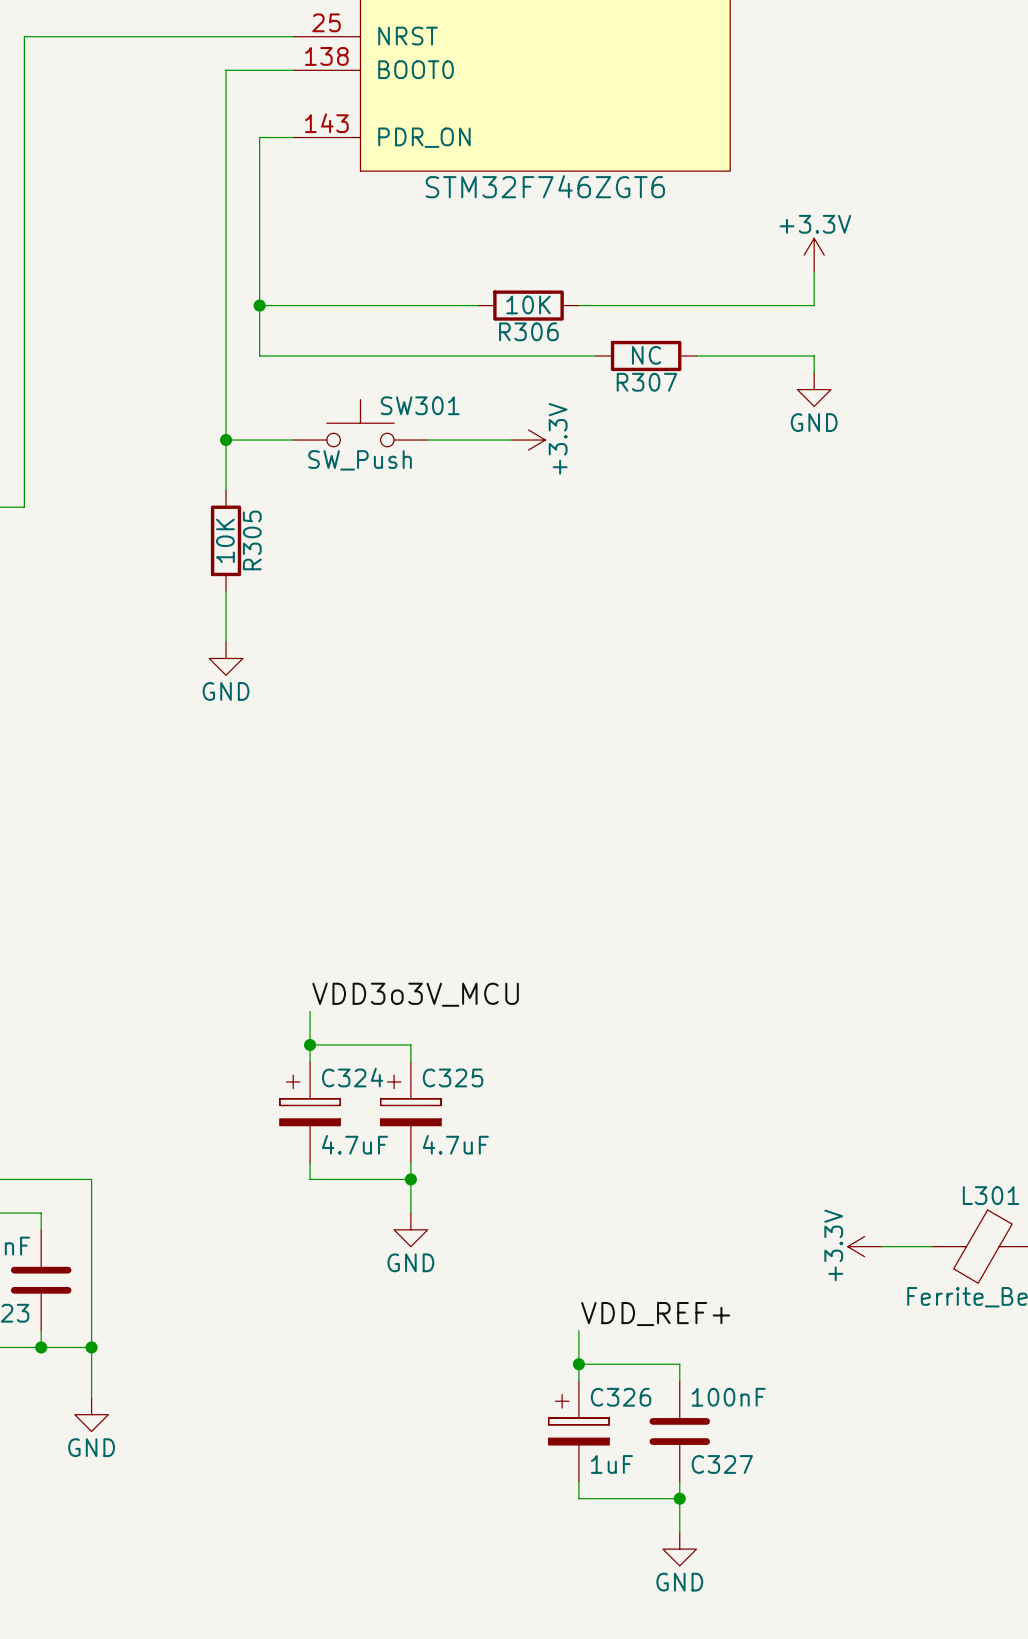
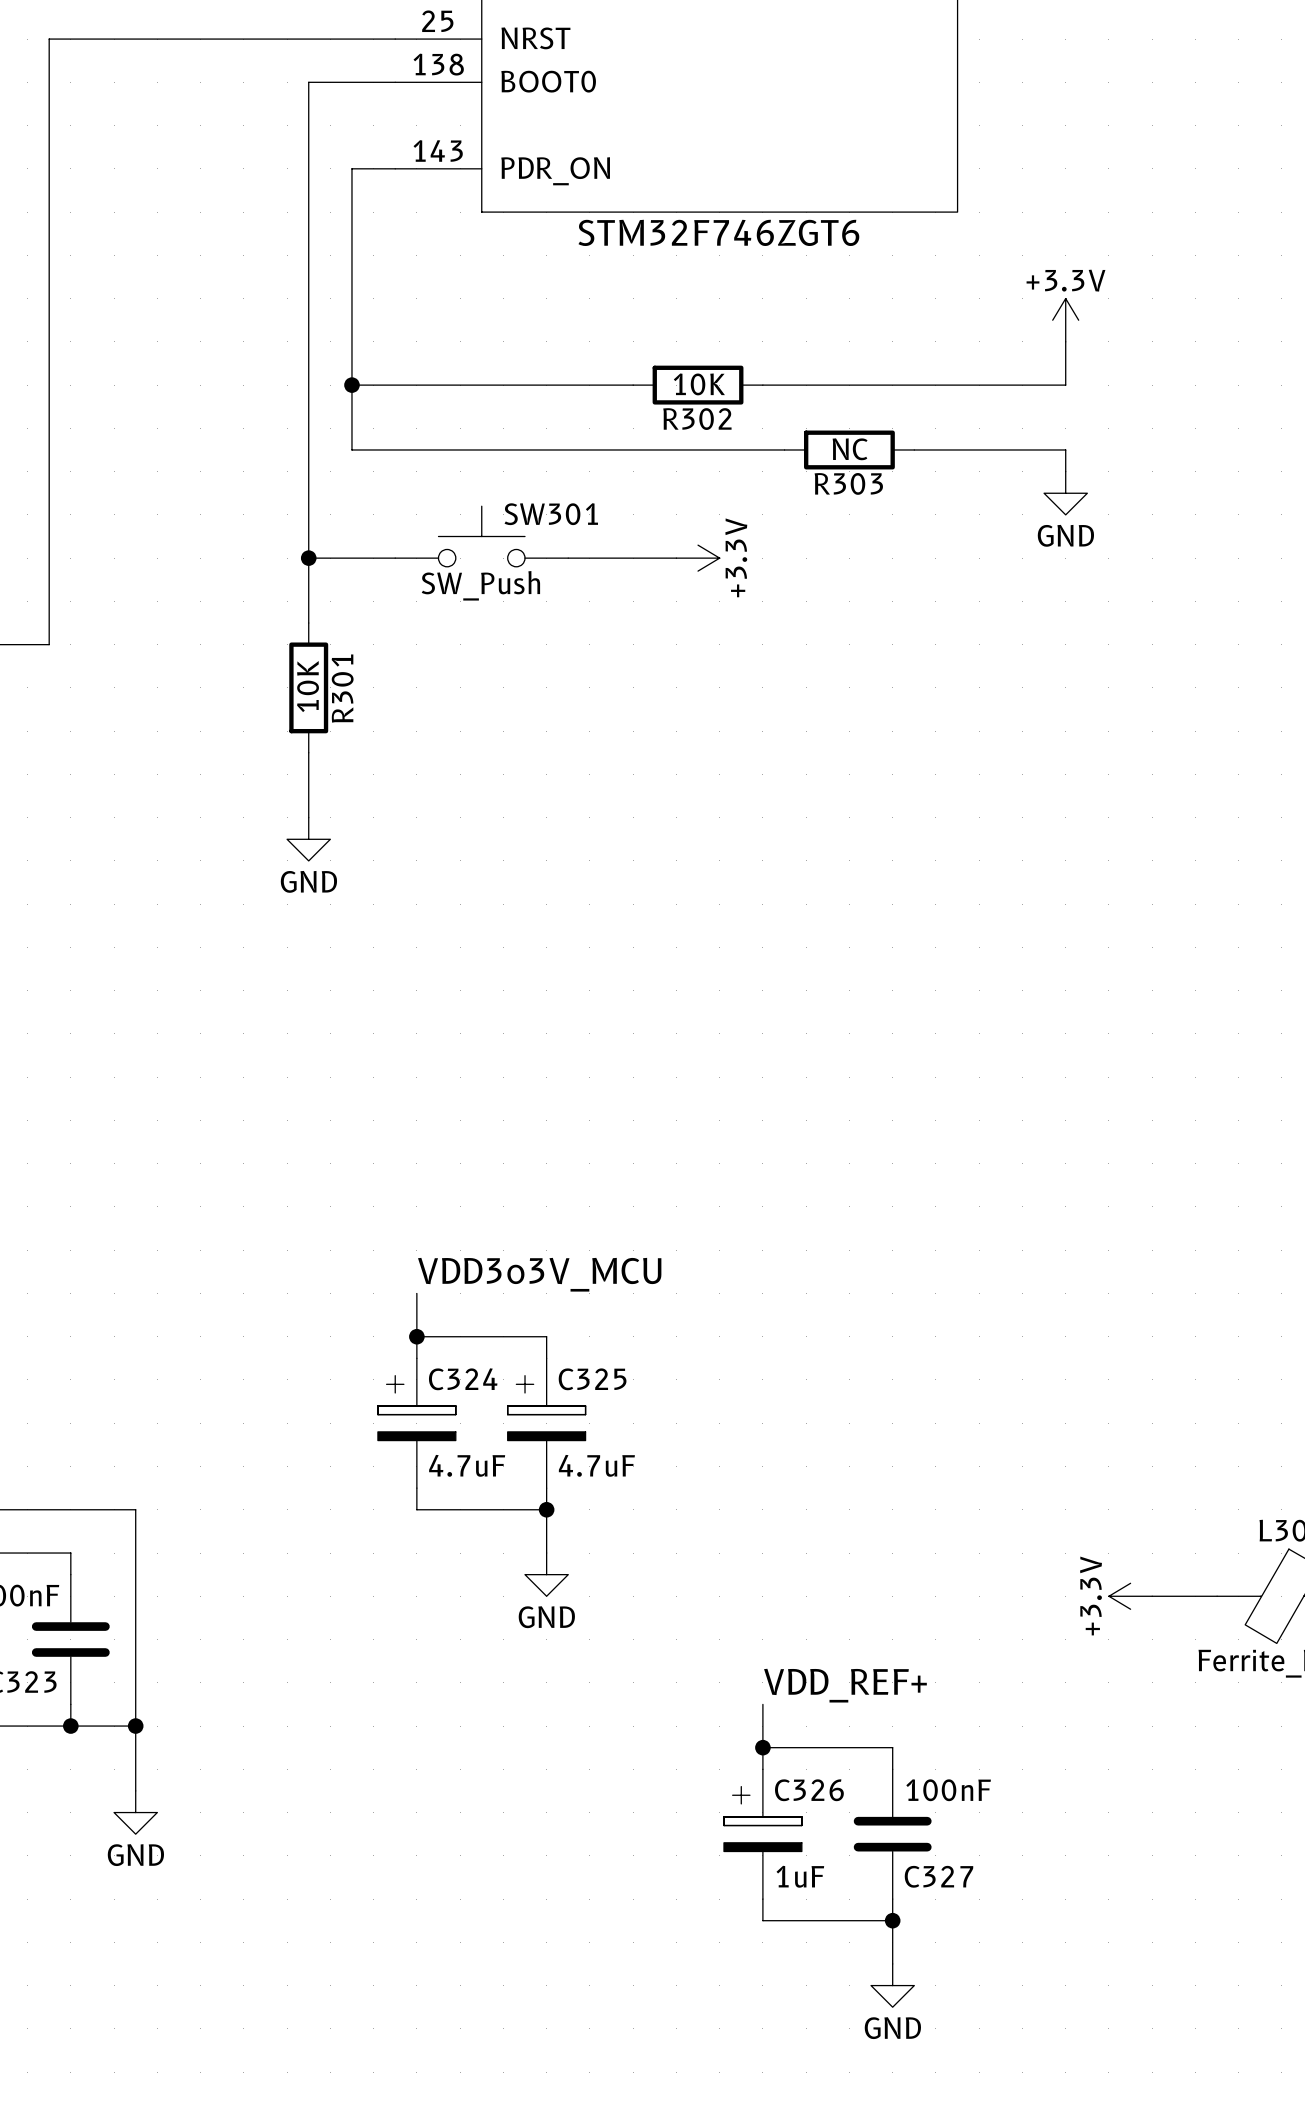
R306 name: R306 (528, 331) -> R302 (697, 419)
R307 name: R307 (646, 382) -> R303 (848, 483)
R305 name: R305 (252, 540) -> R301 (342, 688)

